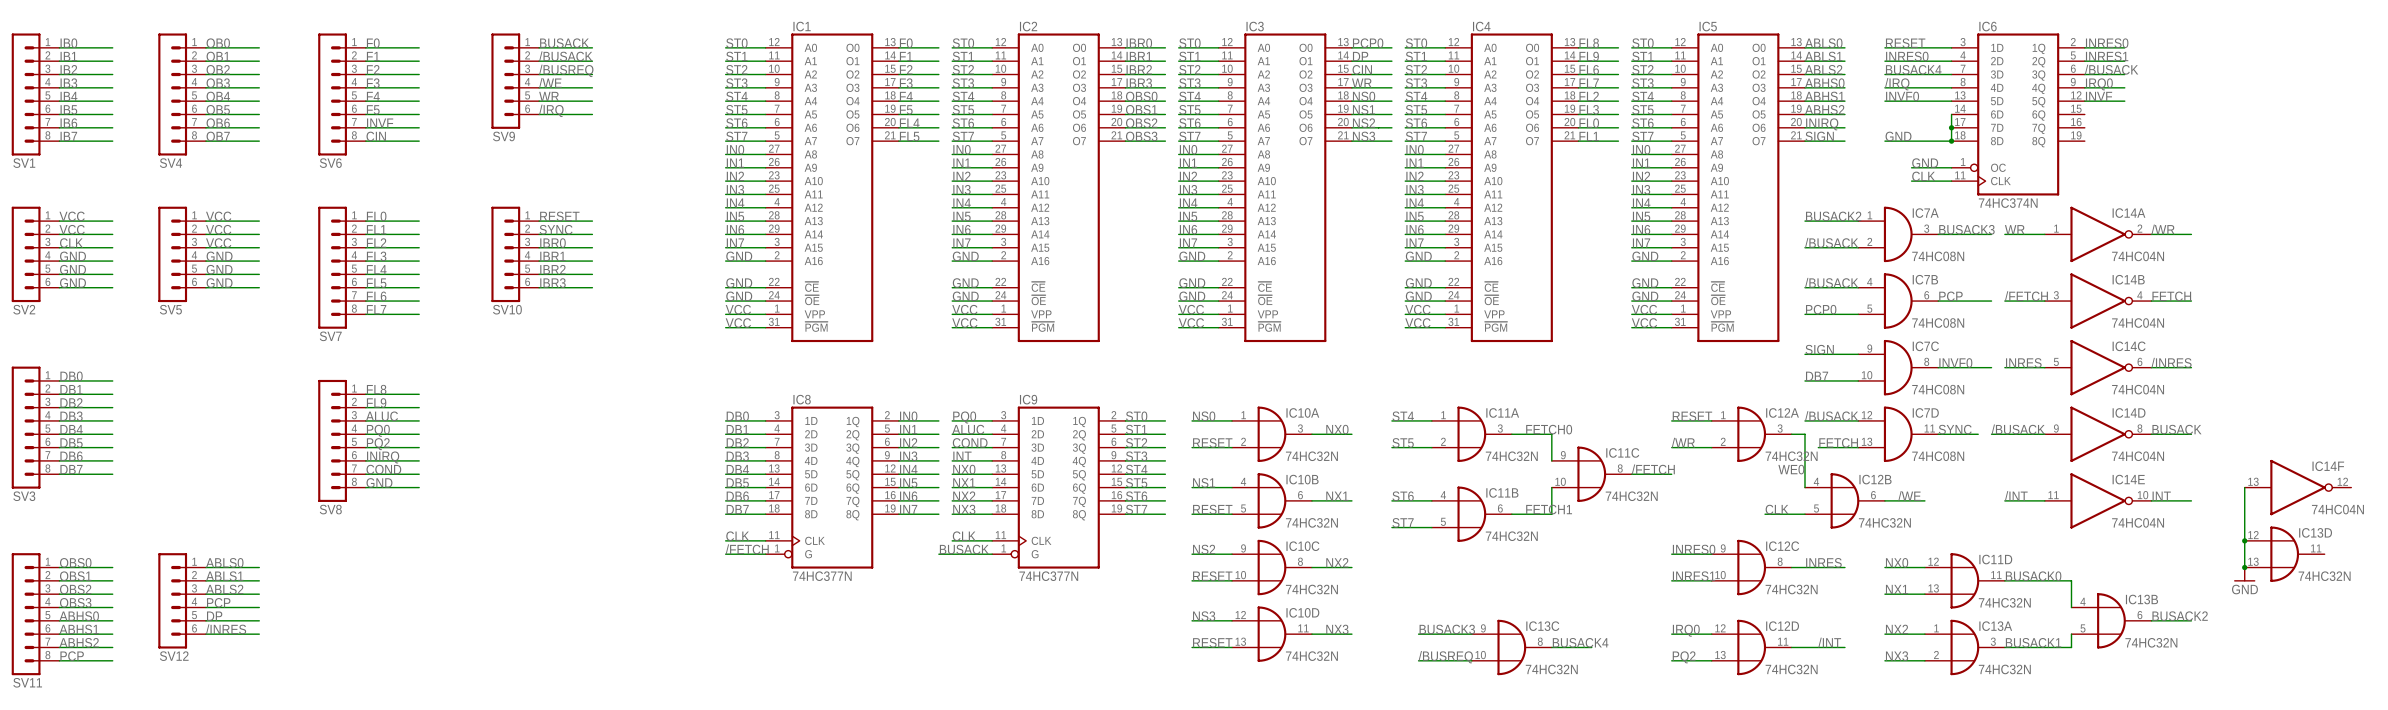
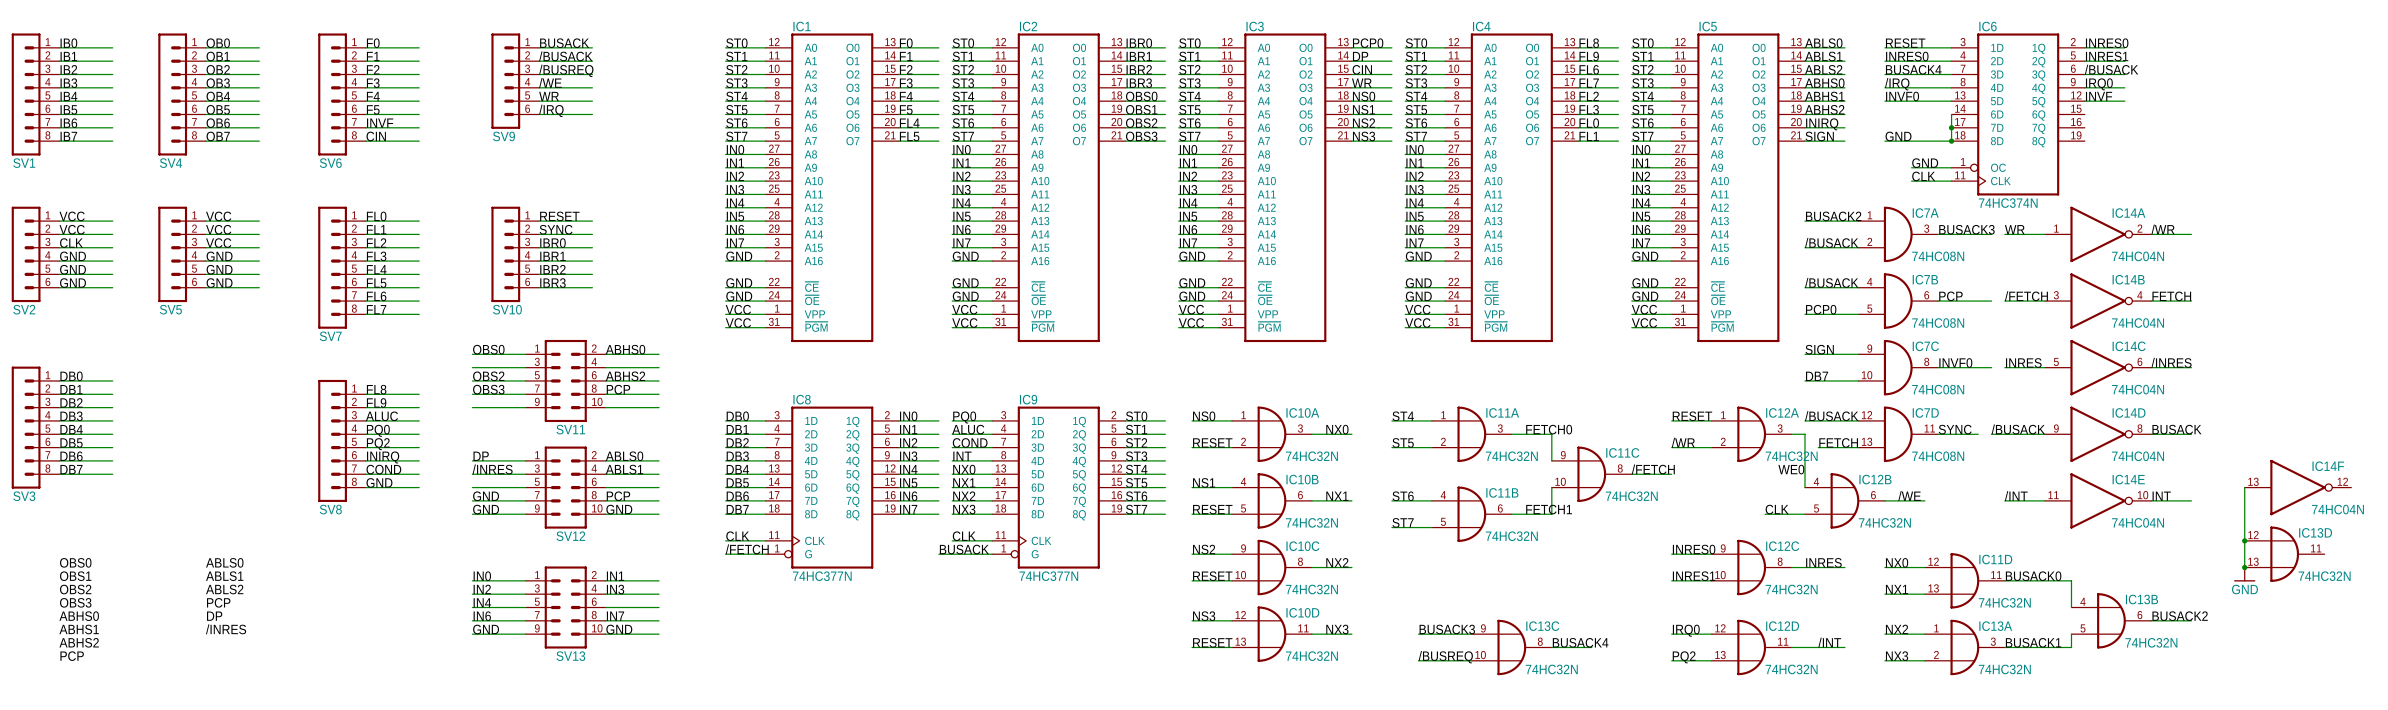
label: none -> OBS0 (488, 349)
label: none -> ABHS0 (625, 349)
wire: none -> (472, 354) (525, 354)
wire: none -> (605, 354) (659, 354)
wire: none -> (472, 367) (525, 367)
wire: none -> (605, 367) (659, 367)
label: none -> OBS2 (488, 376)
label: none -> ABHS2 (625, 376)
wire: none -> (472, 380) (525, 380)
wire: none -> (605, 380) (659, 380)
label: none -> OBS3 (488, 389)
label: none -> PCP (618, 389)
wire: none -> (472, 394) (525, 394)
wire: none -> (605, 394) (659, 394)
wire: none -> (472, 407) (525, 407)
wire: none -> (605, 407) (659, 407)
label: none -> DP (481, 456)
label: none -> ABLS0 (624, 456)
wire: none -> (472, 460) (525, 460)
wire: none -> (605, 460) (659, 460)
label: none -> /INRES (492, 469)
label: none -> ABLS1 (624, 469)
wire: none -> (472, 474) (525, 474)
wire: none -> (605, 474) (659, 474)
wire: none -> (472, 487) (525, 487)
wire: none -> (605, 487) (659, 487)
label: none -> GND (486, 496)
label: none -> PCP (618, 496)
wire: none -> (472, 500) (525, 500)
wire: none -> (605, 500) (659, 500)
label: none -> GND (486, 509)
label: none -> GND (619, 509)
wire: none -> (472, 514) (525, 514)
wire: none -> (605, 514) (659, 514)
SV11 symbol: [11, 553, 60, 676] -> [525, 339, 606, 423]
SV12 symbol: [158, 553, 206, 649] -> [525, 446, 606, 529]
wire: (59, 567) (112, 567) -> none
wire: (205, 567) (259, 567) -> none
label: none -> IN0 (482, 576)
label: none -> IN1 (615, 576)
wire: (59, 580) (112, 580) -> none
wire: (205, 580) (259, 580) -> none
wire: none -> (472, 580) (525, 580)
wire: none -> (605, 580) (659, 580)
label: none -> IN2 (482, 589)
label: none -> IN3 (615, 589)
wire: (59, 594) (112, 594) -> none
wire: (205, 594) (259, 594) -> none
wire: none -> (472, 594) (525, 594)
wire: none -> (605, 594) (659, 594)
label: none -> IN4 (482, 602)
wire: (59, 607) (112, 607) -> none
wire: (205, 607) (259, 607) -> none
wire: none -> (472, 607) (525, 607)
SV13: none -> (565, 607)
wire: none -> (605, 607) (659, 607)
label: none -> IN6 (482, 616)
label: none -> IN7 (615, 616)
wire: (59, 620) (112, 620) -> none
wire: (205, 620) (259, 620) -> none
wire: none -> (472, 620) (525, 620)
wire: none -> (605, 620) (659, 620)
label: none -> GND (486, 629)
label: none -> GND (619, 629)
wire: (59, 634) (112, 634) -> none
wire: (205, 634) (259, 634) -> none
wire: none -> (472, 634) (525, 634)
wire: none -> (605, 634) (659, 634)
wire: (59, 647) (112, 647) -> none
wire: (59, 660) (112, 660) -> none
SV11 name position: SV11 (27, 682) -> SV11 (570, 429)

